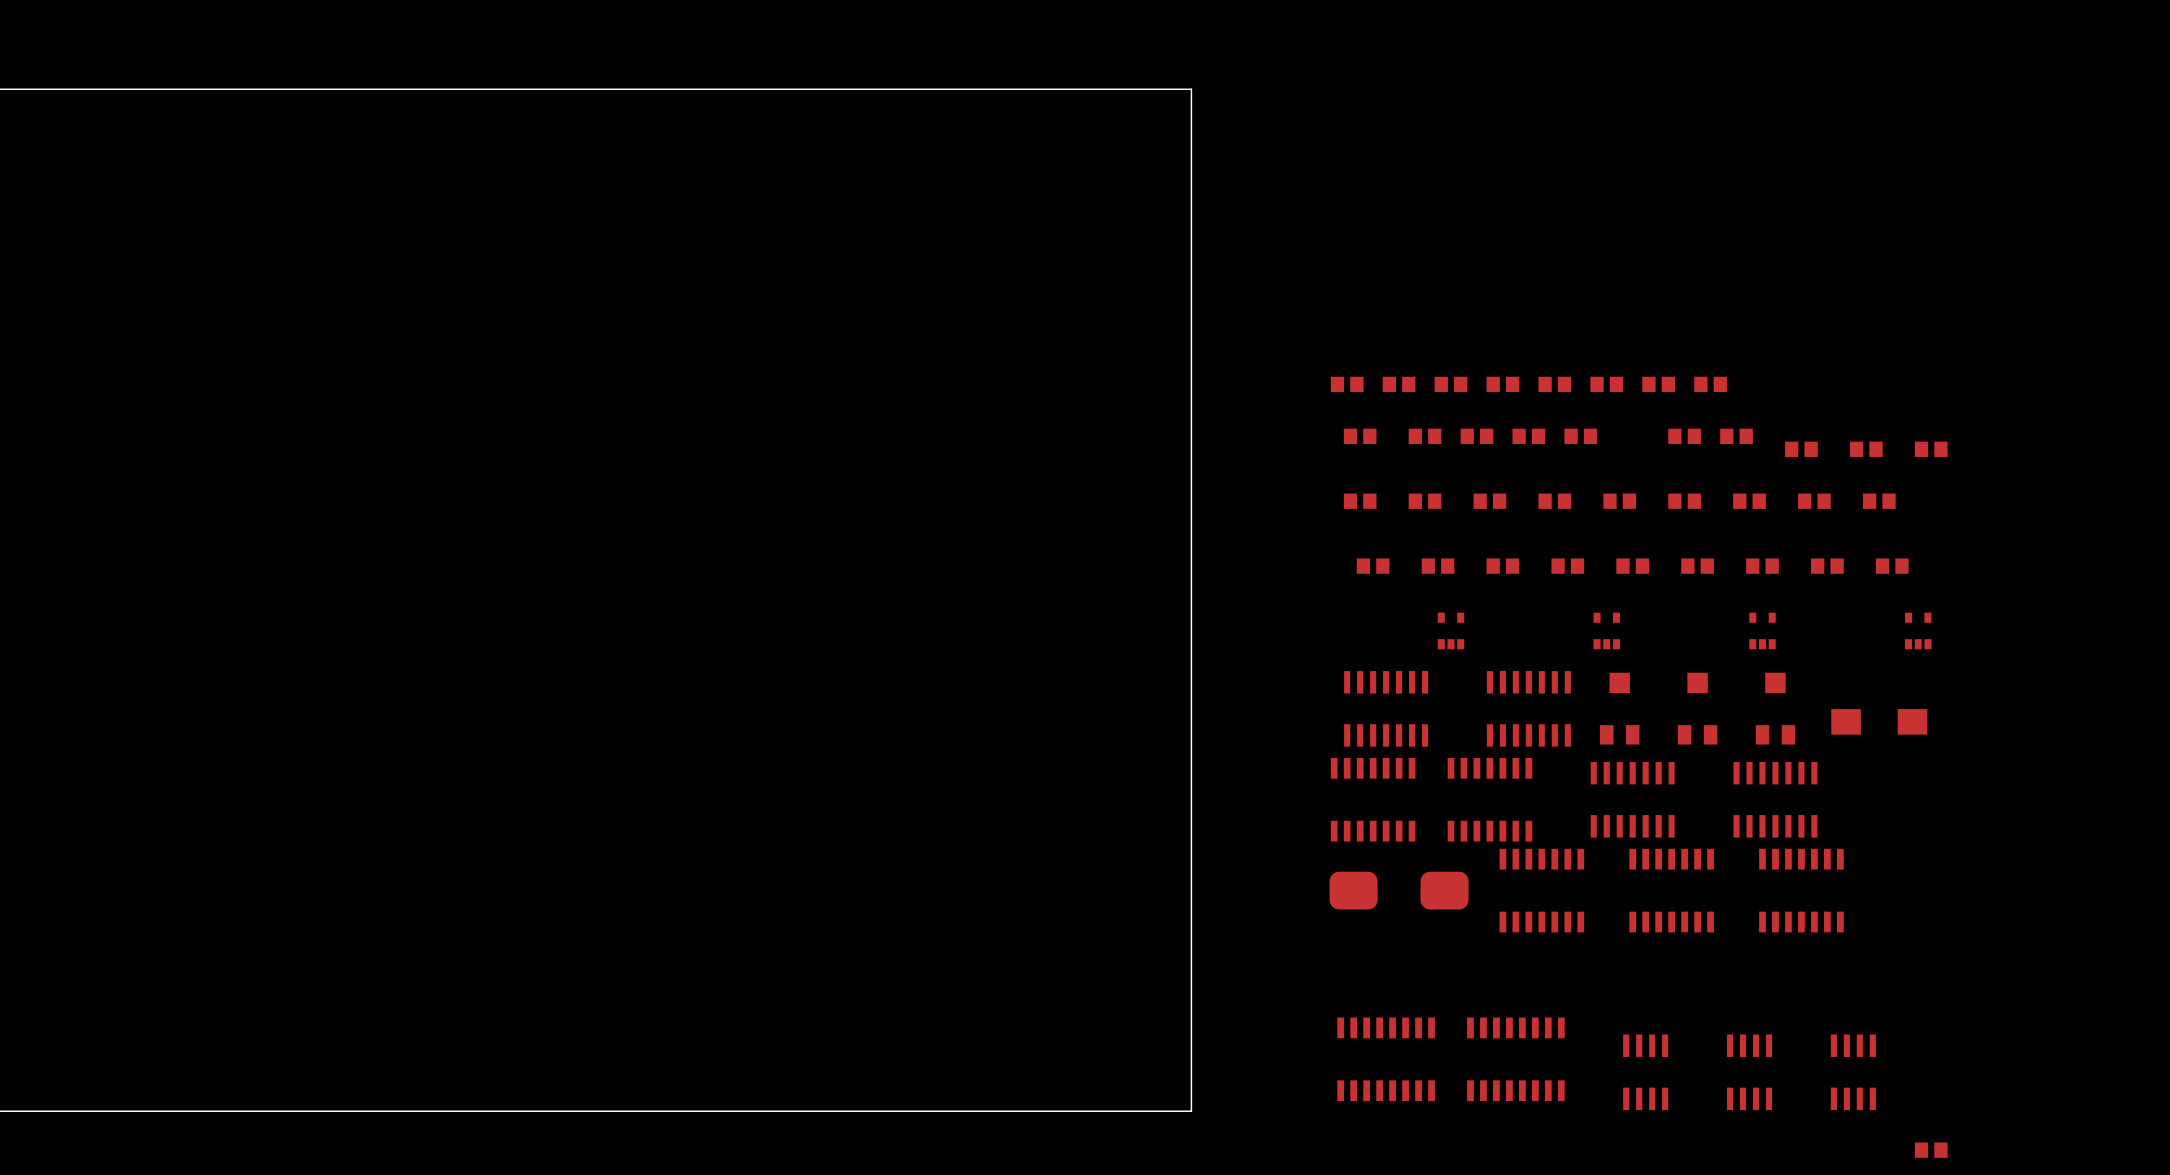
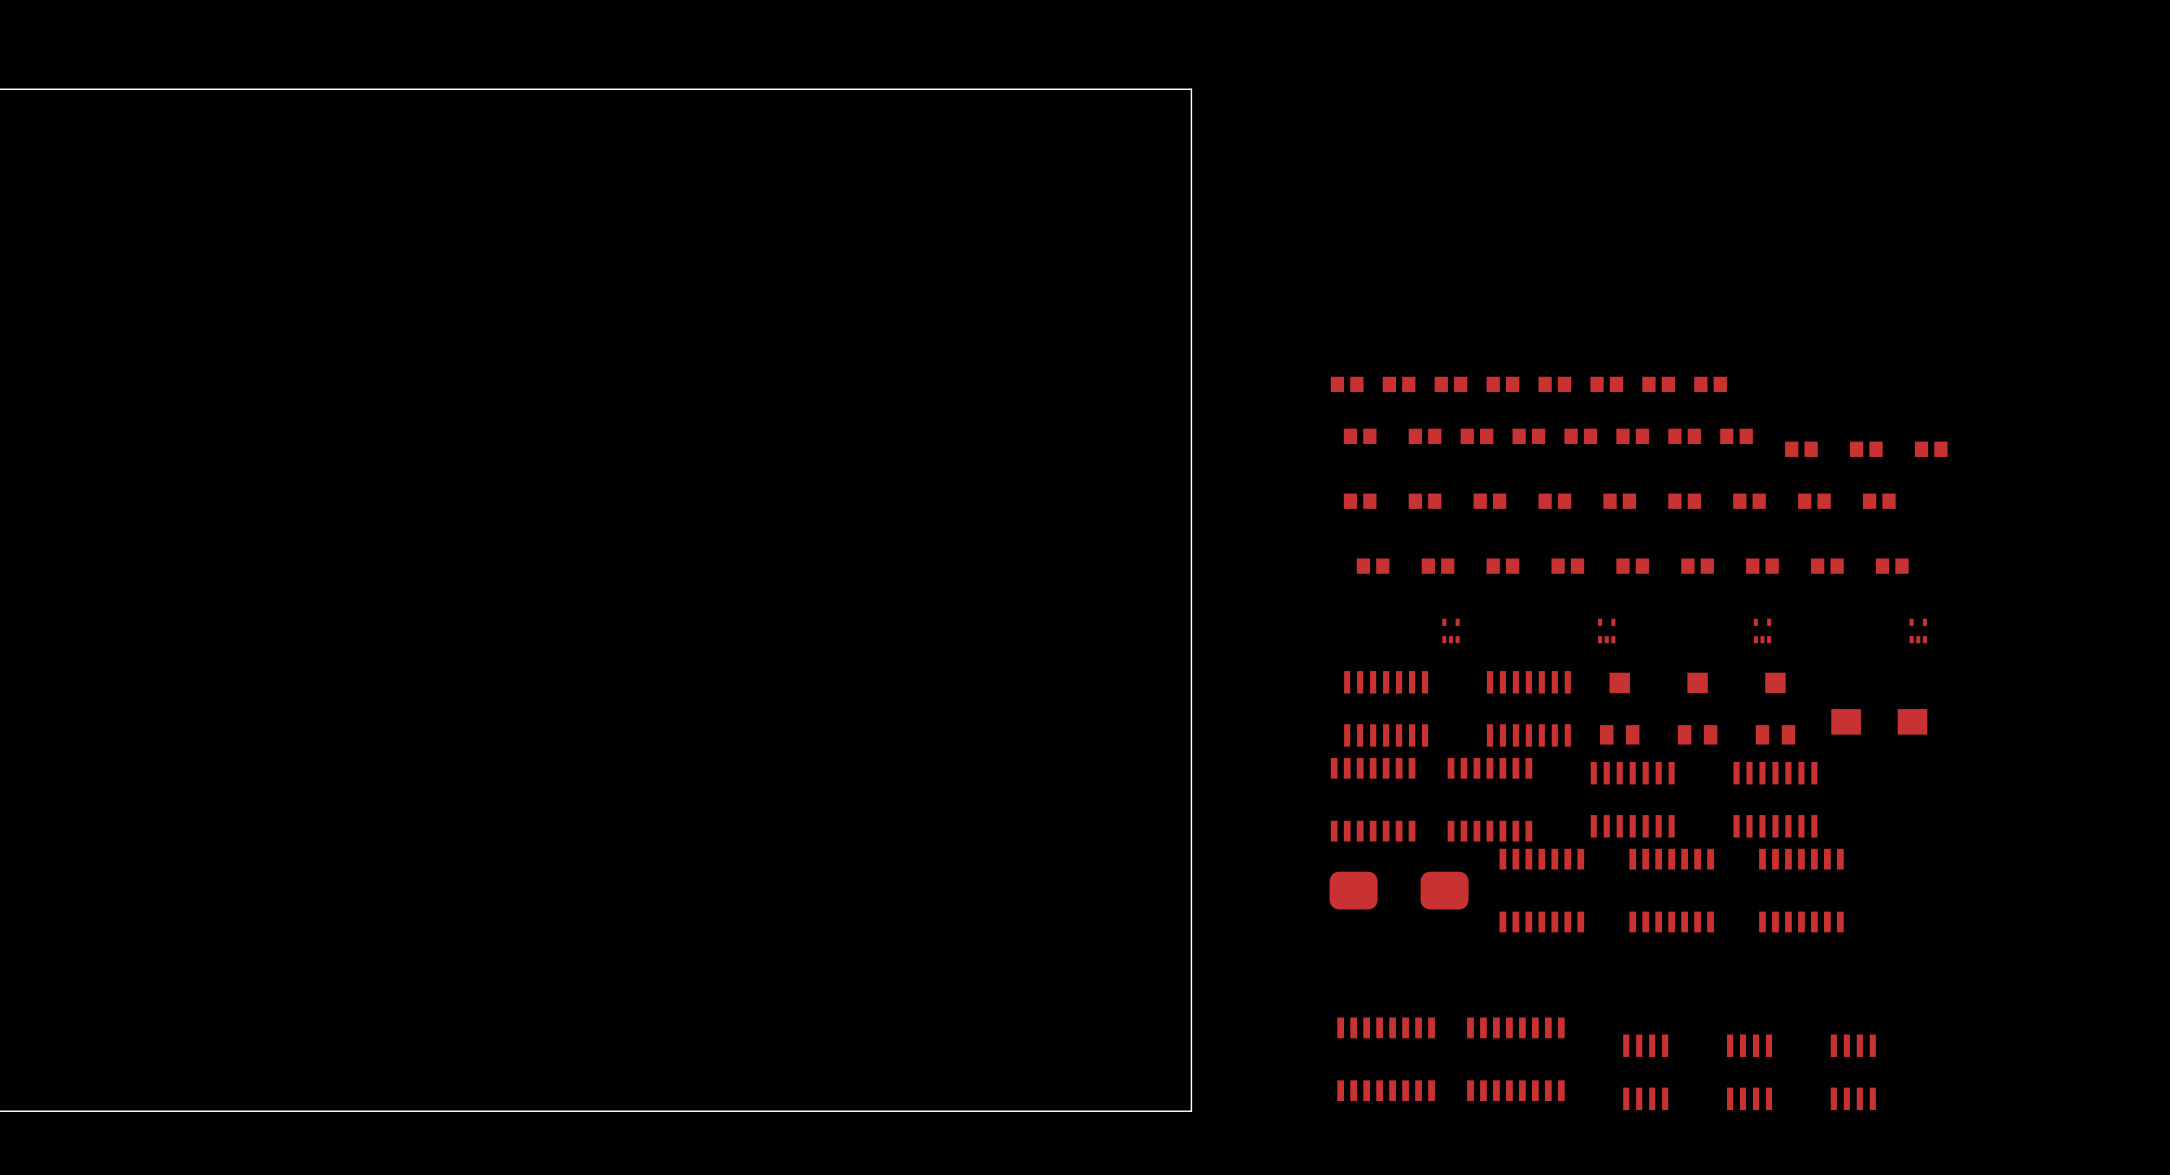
part: none -> (1632, 436)
part footprint: [1437, 612, 1465, 650] -> [1442, 618, 1460, 644]
part footprint: [1593, 612, 1620, 650] -> [1598, 618, 1616, 644]
part footprint: [1749, 612, 1776, 650] -> [1753, 618, 1772, 644]
part footprint: [1905, 612, 1932, 650] -> [1909, 618, 1927, 644]
part: (1931, 1150) -> none

